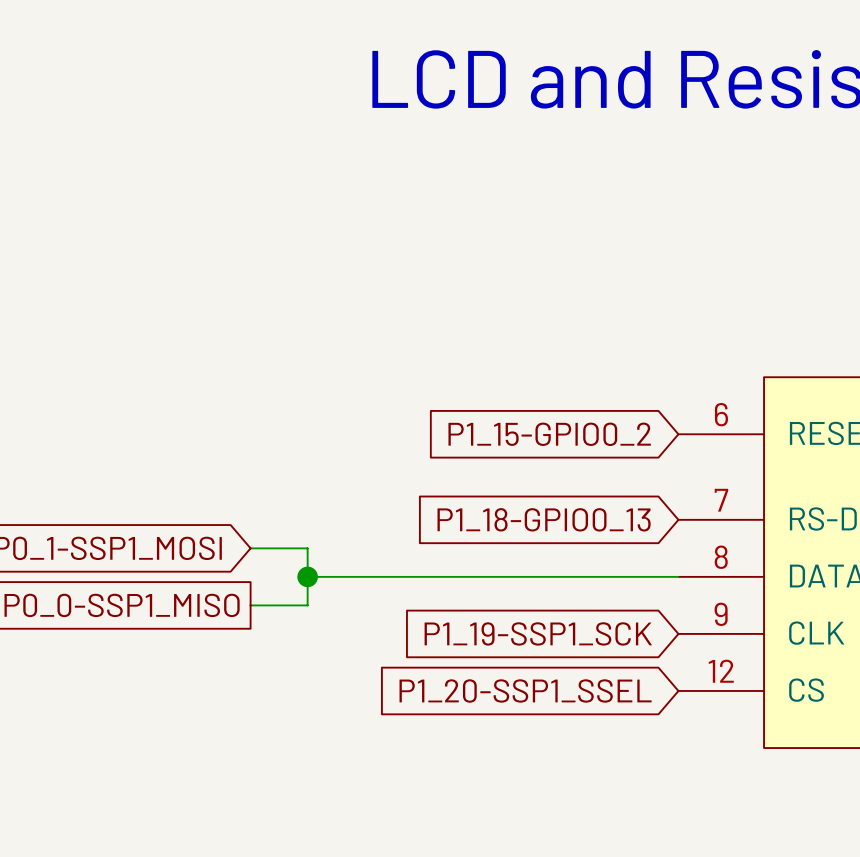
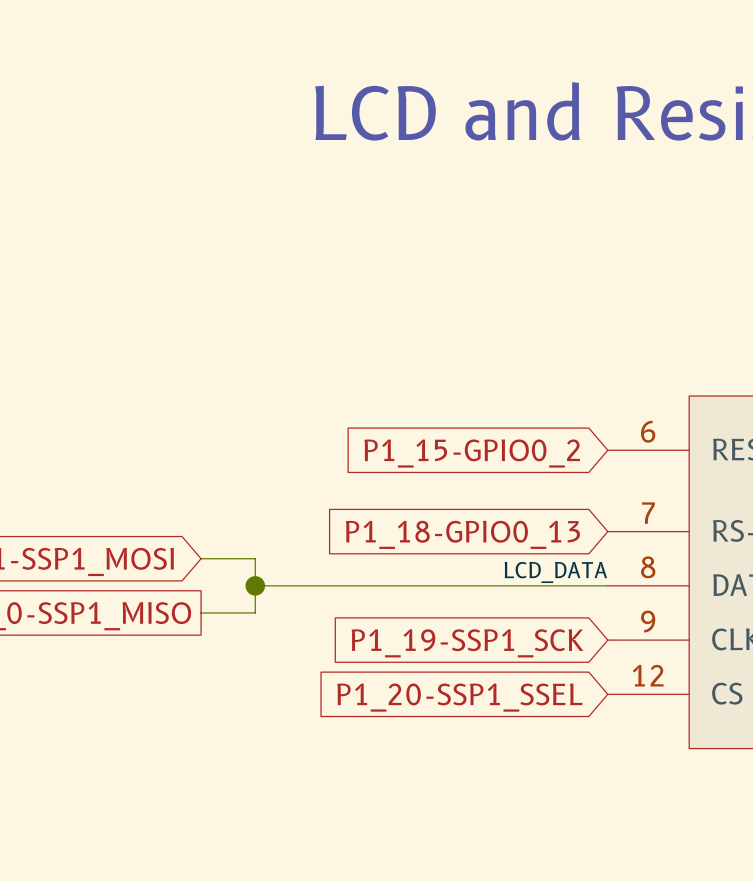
label: none -> LCD_DATA (555, 572)

